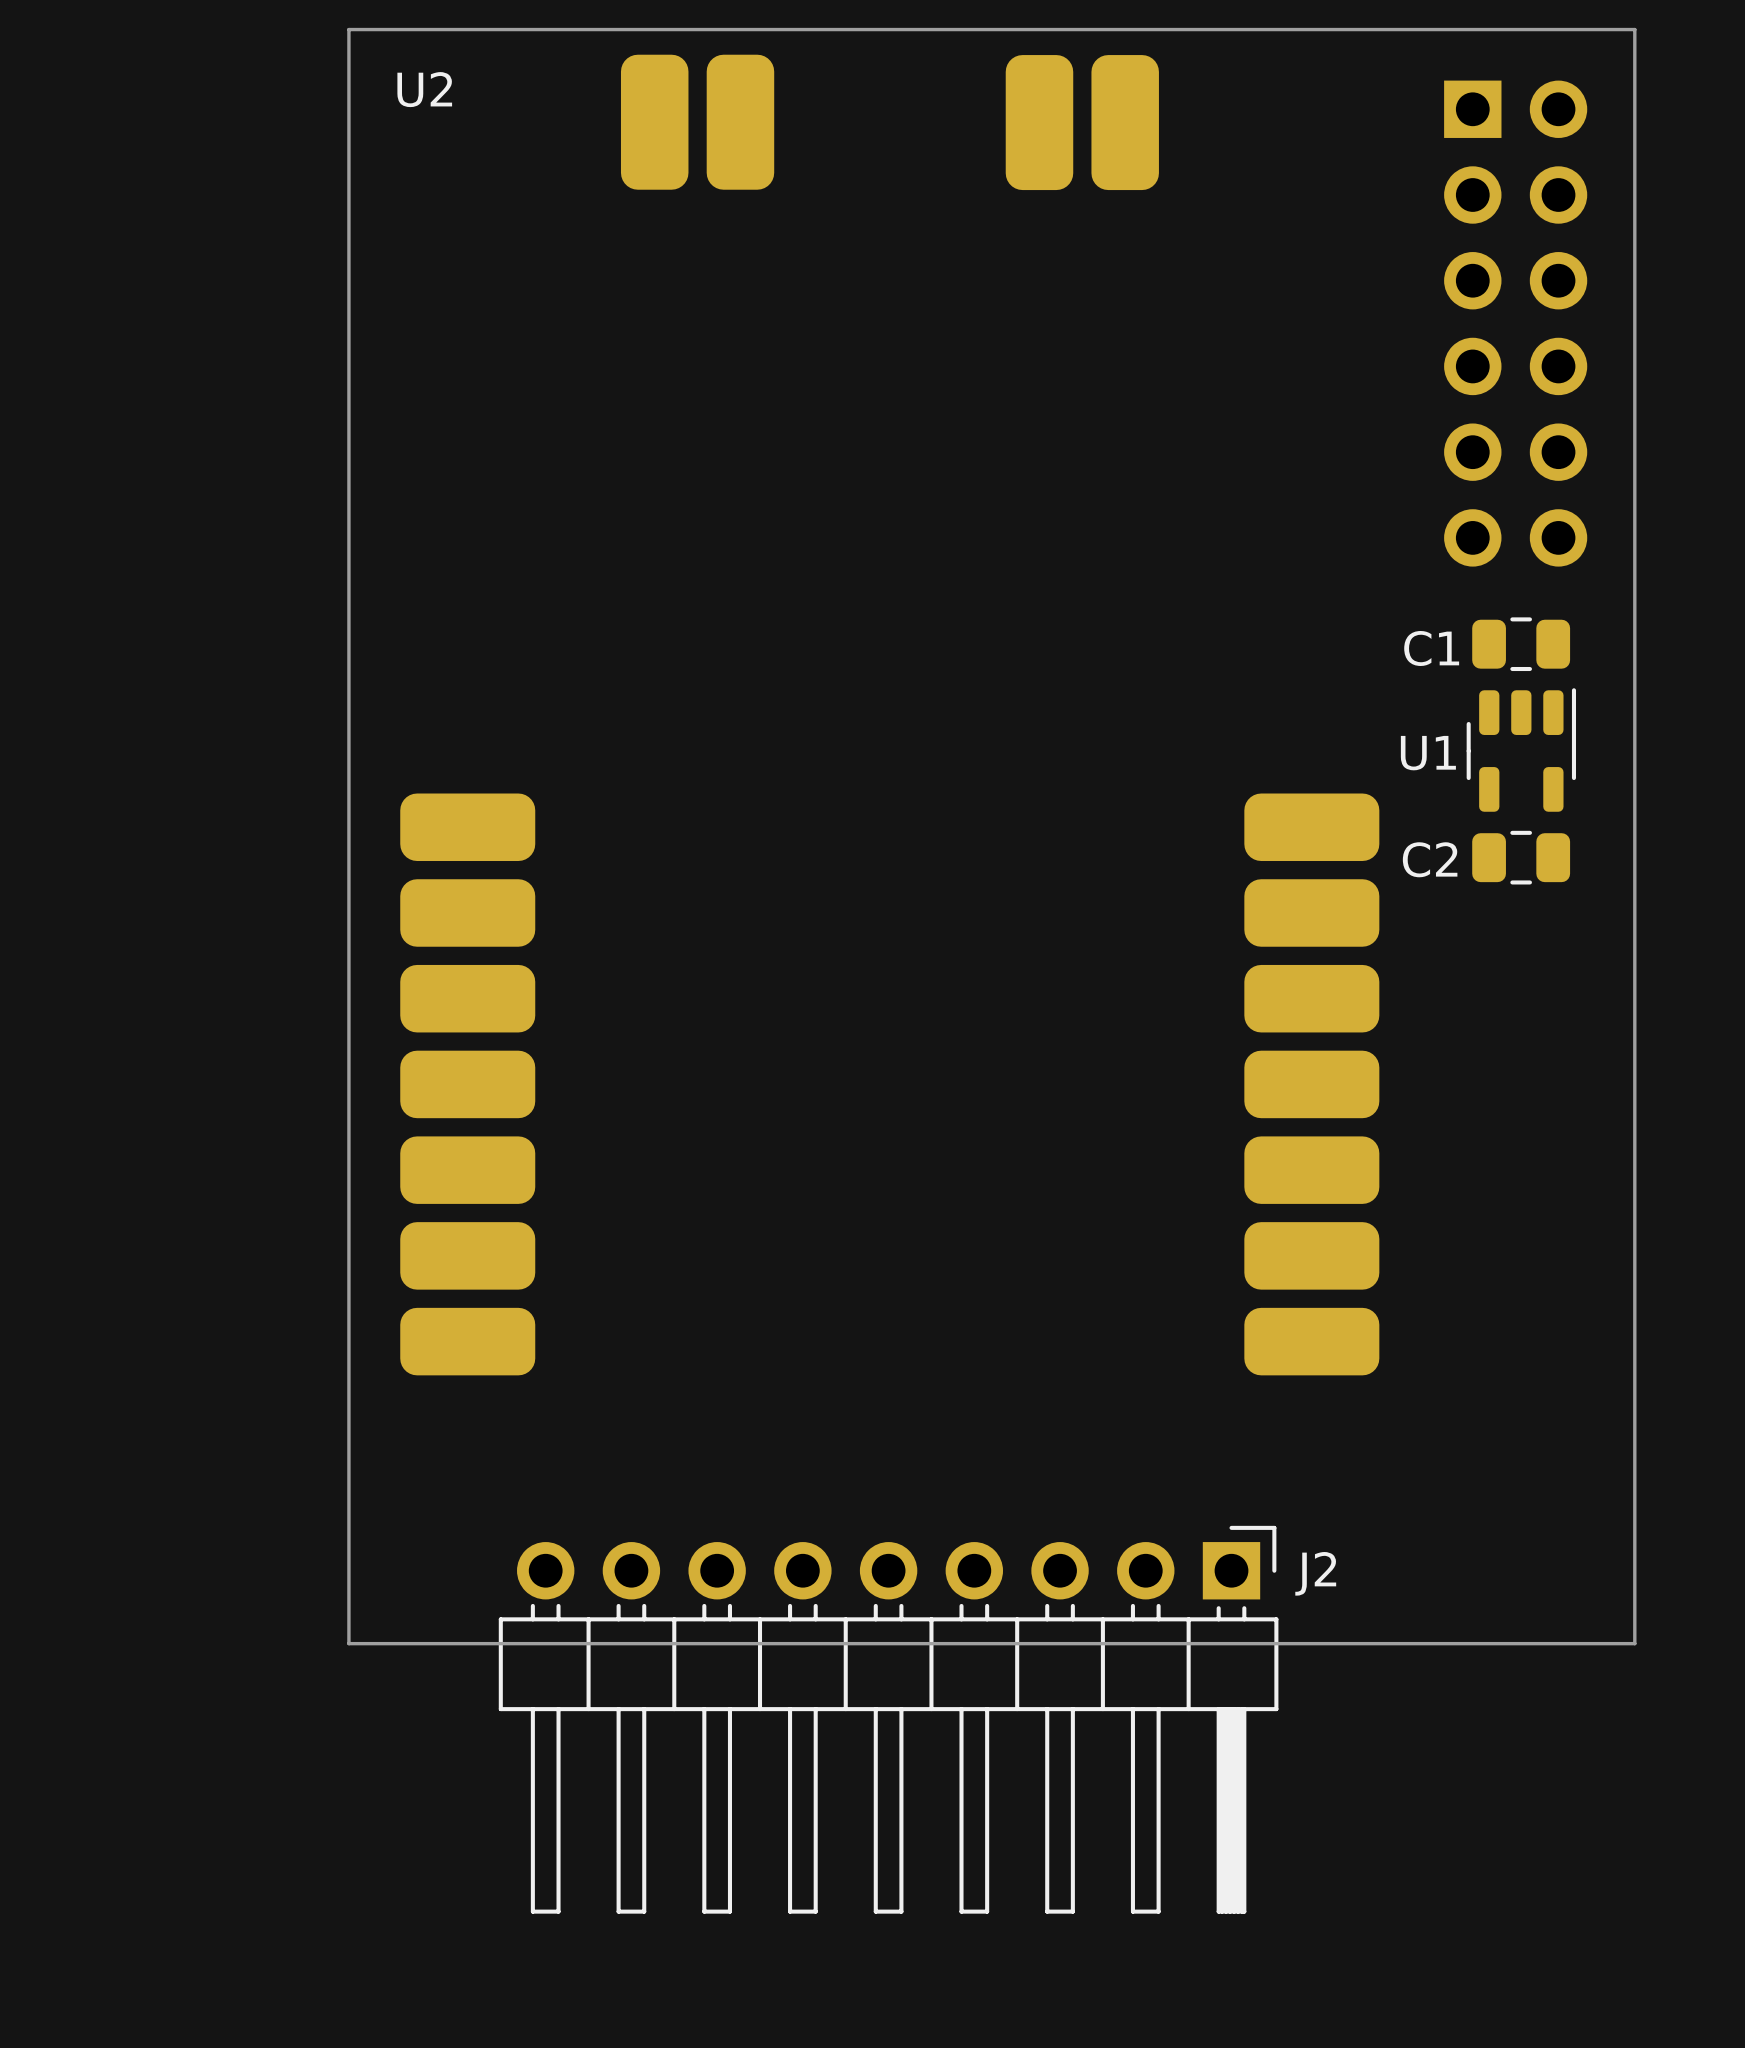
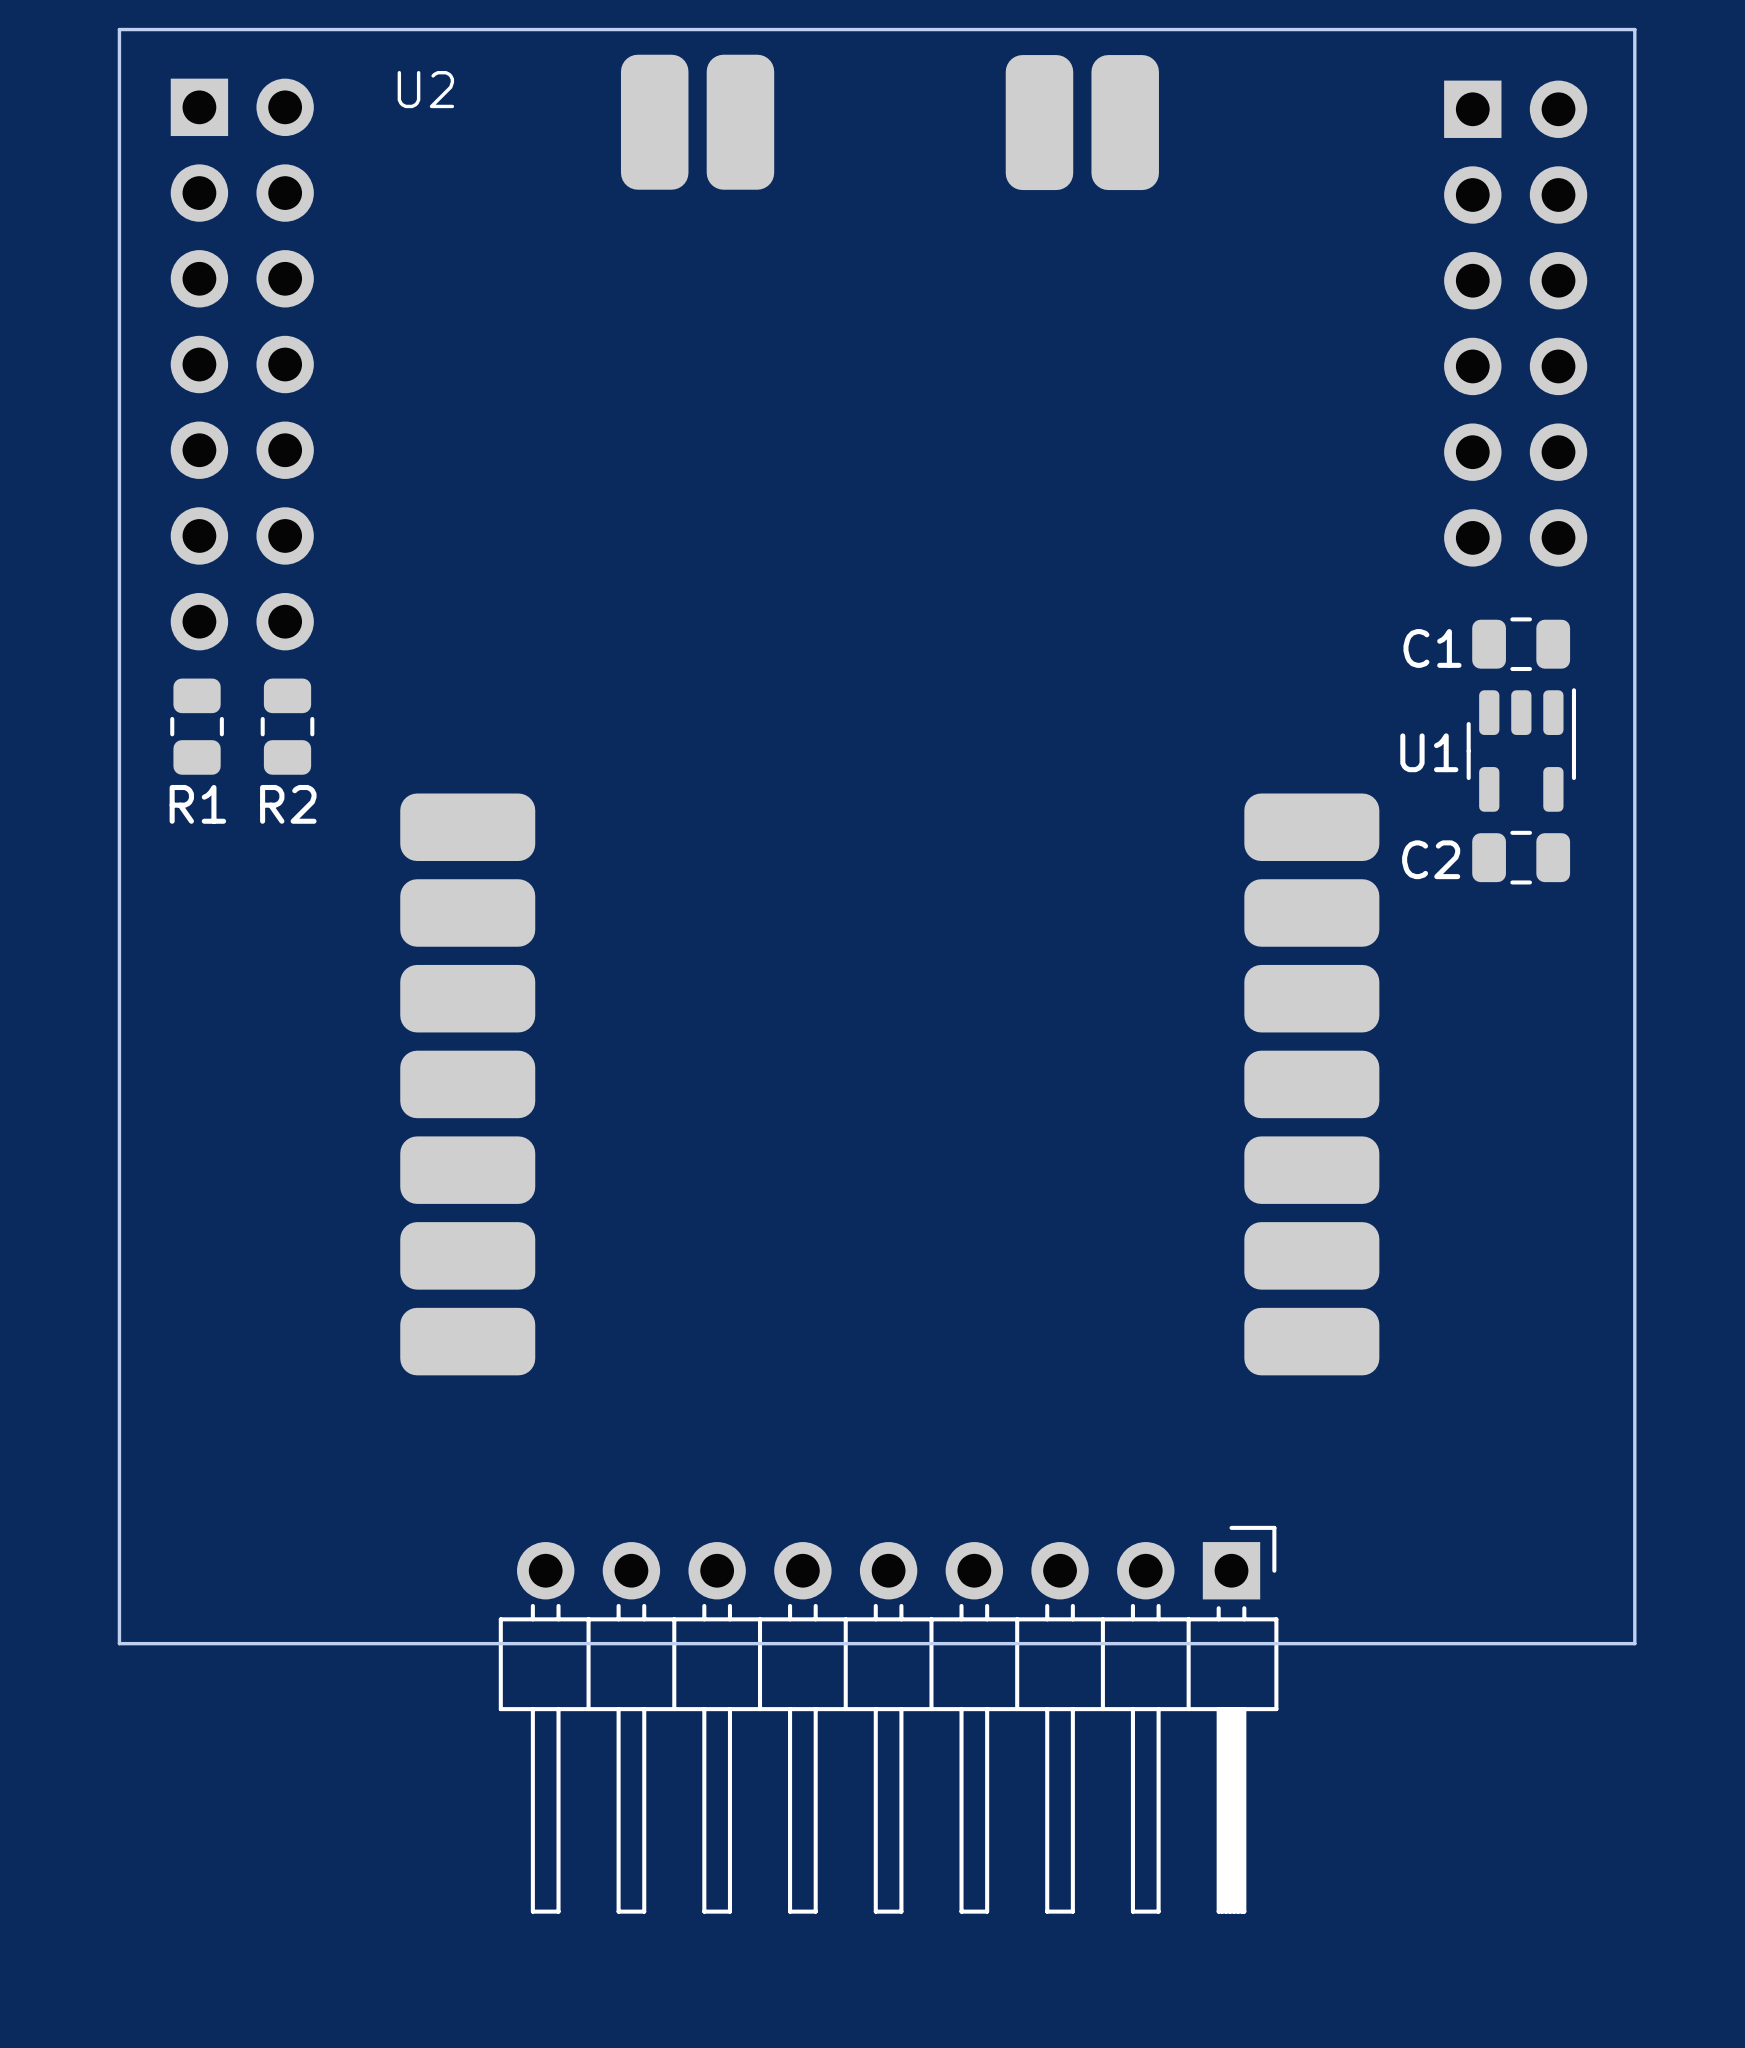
board edge: (348, 29) (348, 1643) -> (348, 29) (119, 29) (119, 1643) (348, 1643)
part: none -> (242, 364)
R1: none -> (197, 726)
R2: none -> (287, 726)
J2 name: J2 (1315, 1573) -> none

